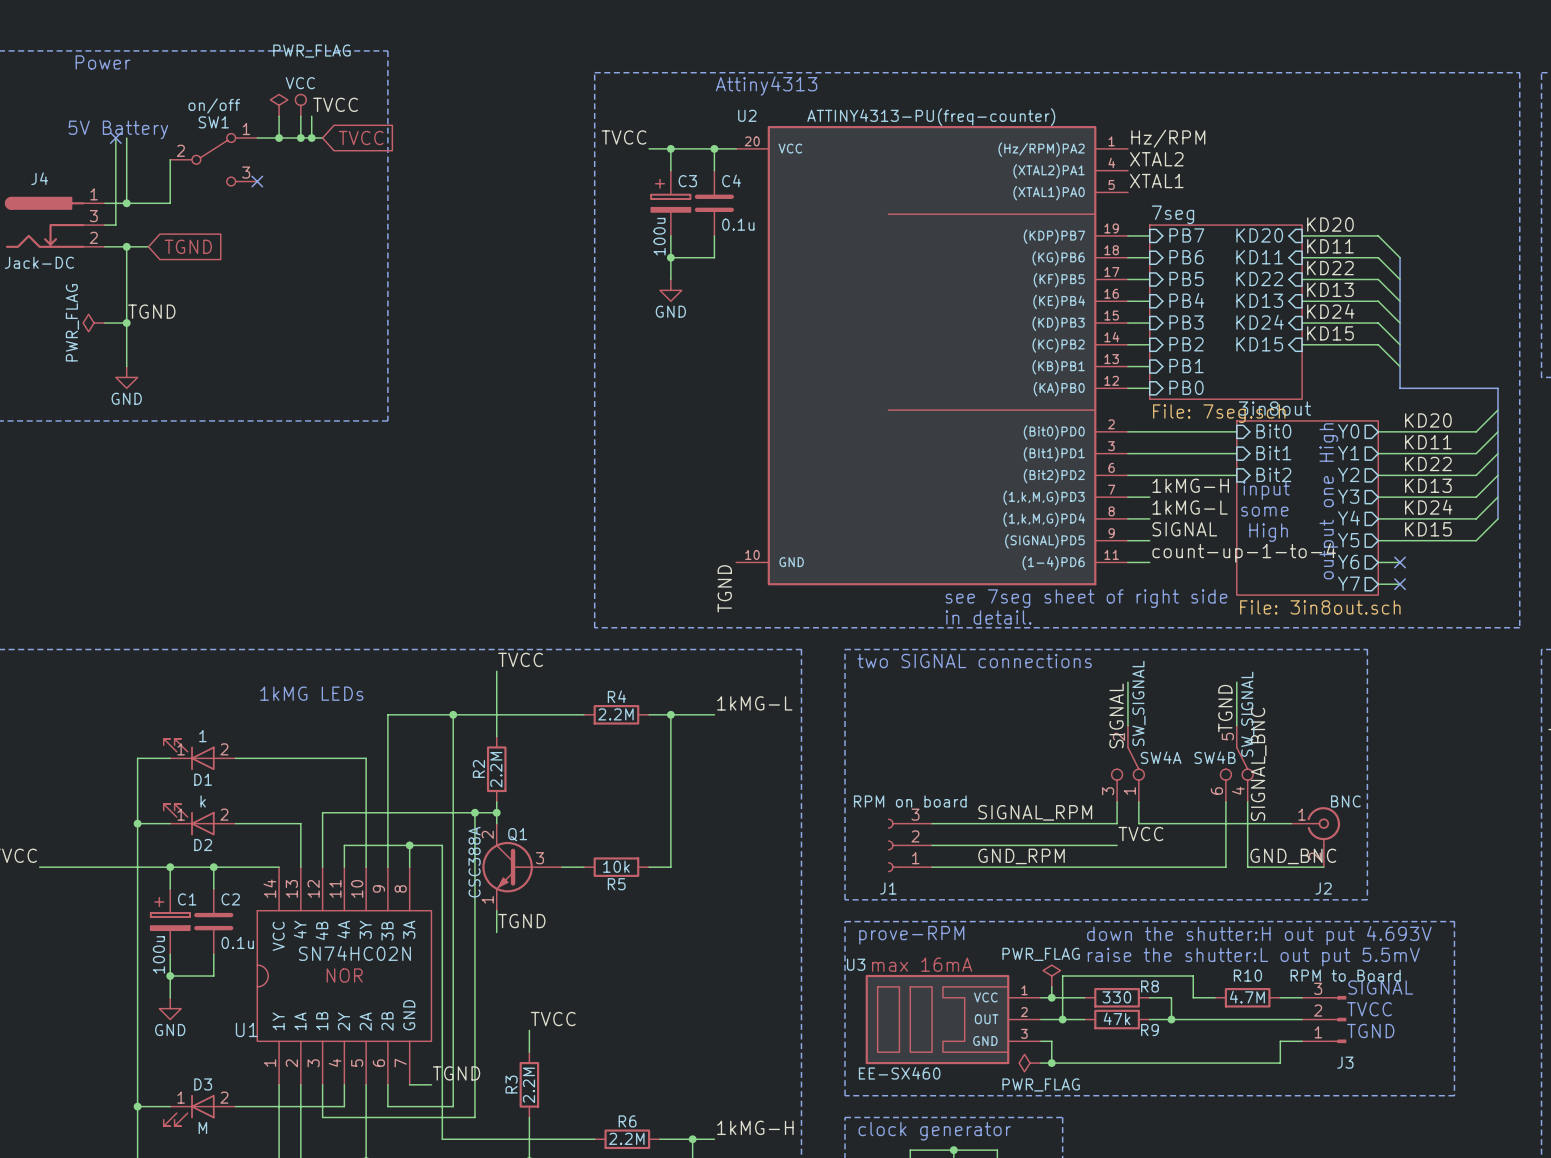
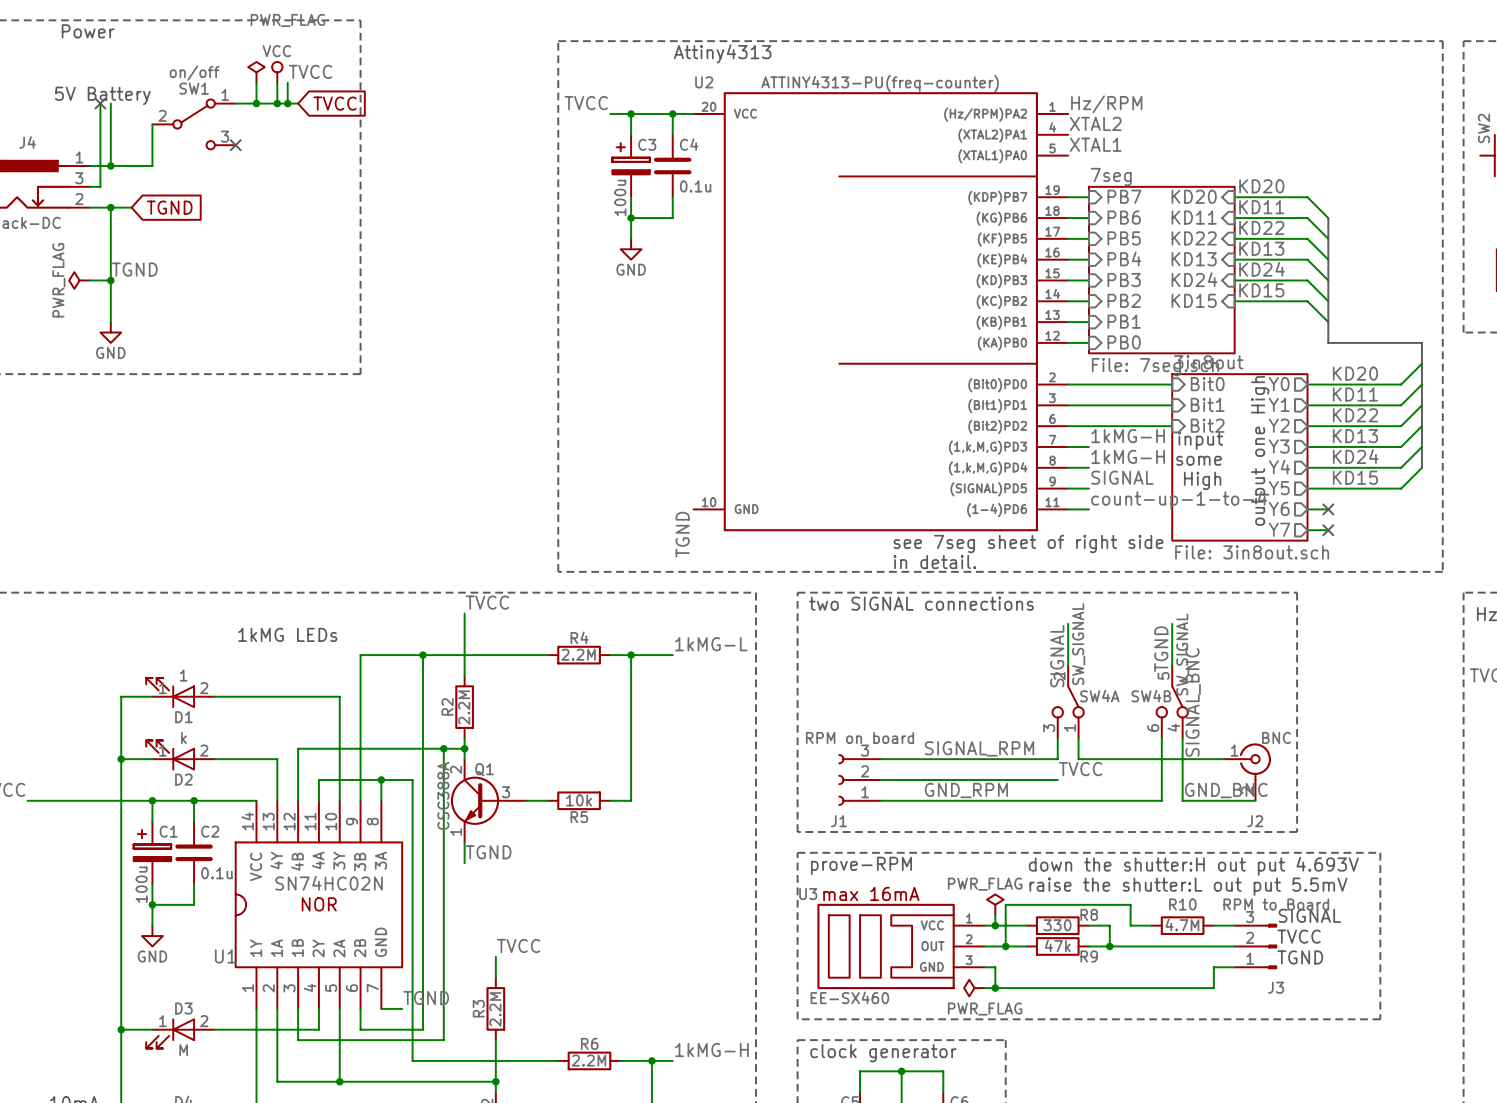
label: 1kMG-L (1190, 507) -> 1kMG-H (1128, 456)

